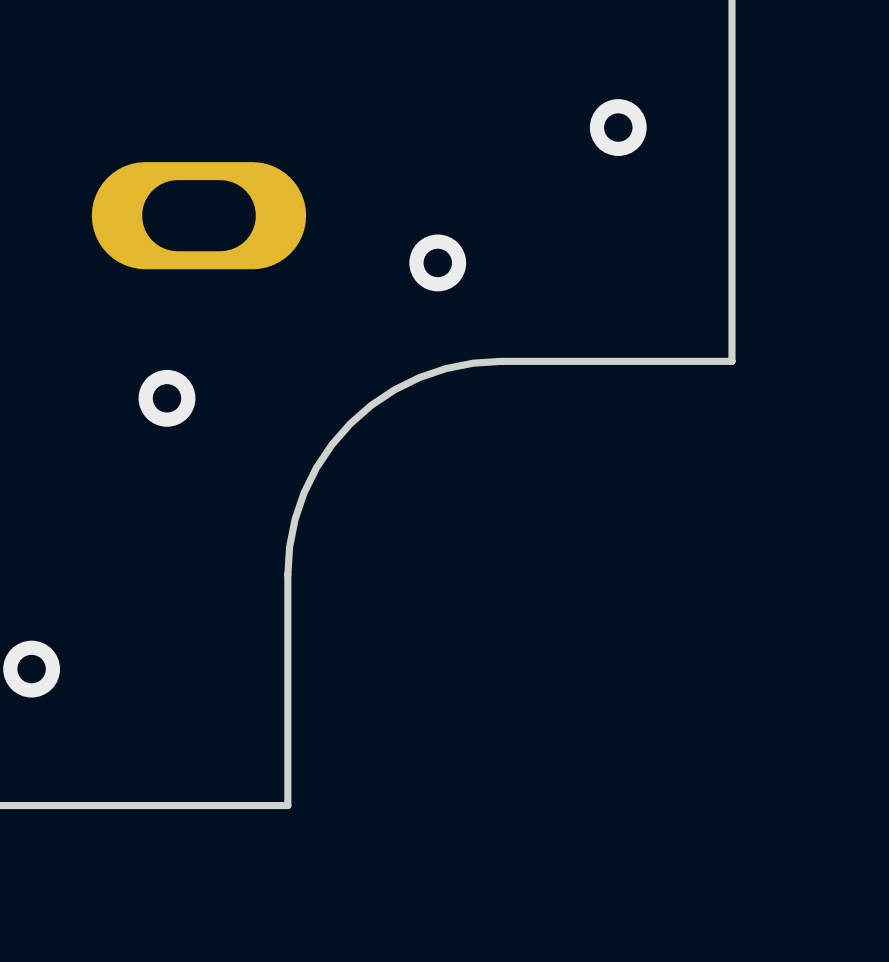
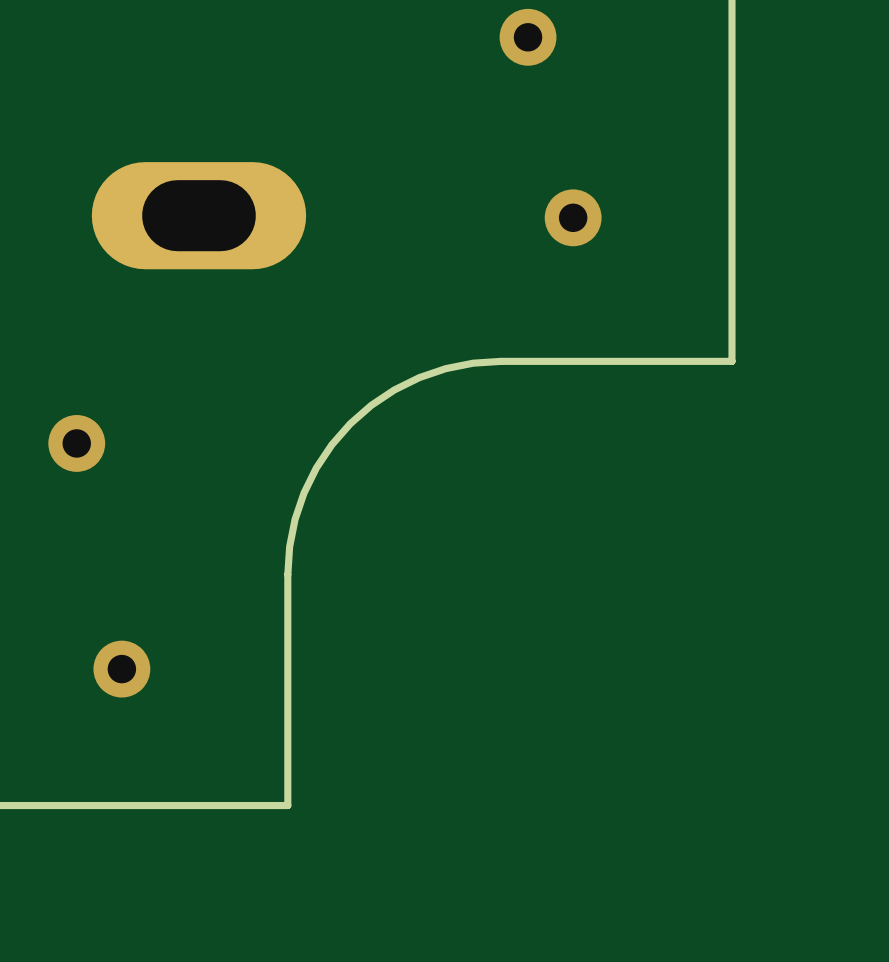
via: none -> (528, 37)
via: (618, 127) -> none
via: none -> (573, 217)
via: (437, 262) -> none
via position: (167, 398) -> (76, 443)
via position: (31, 669) -> (121, 669)

